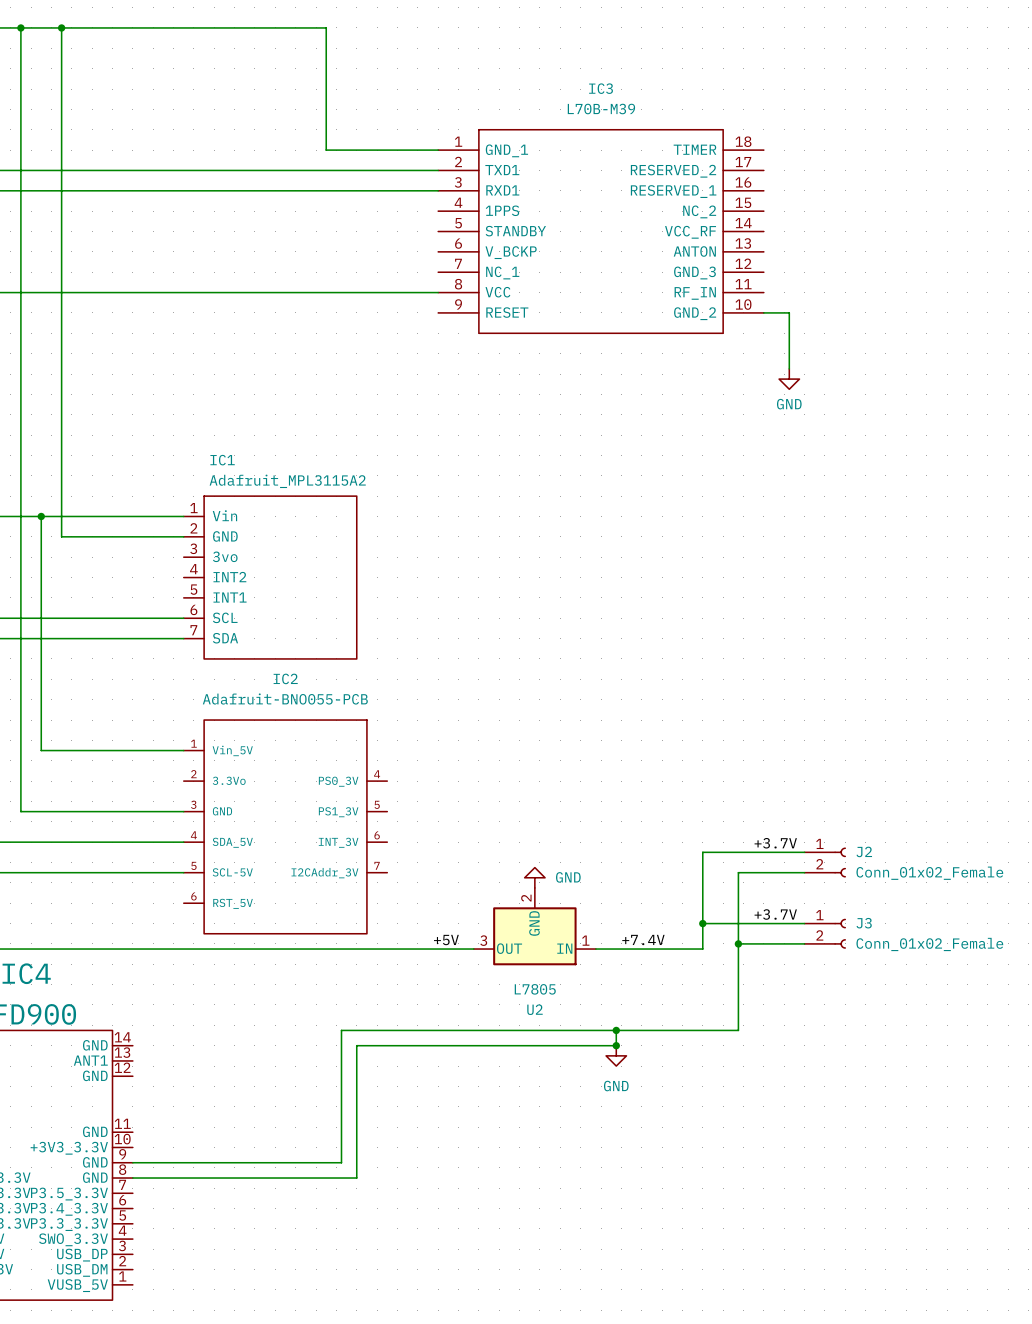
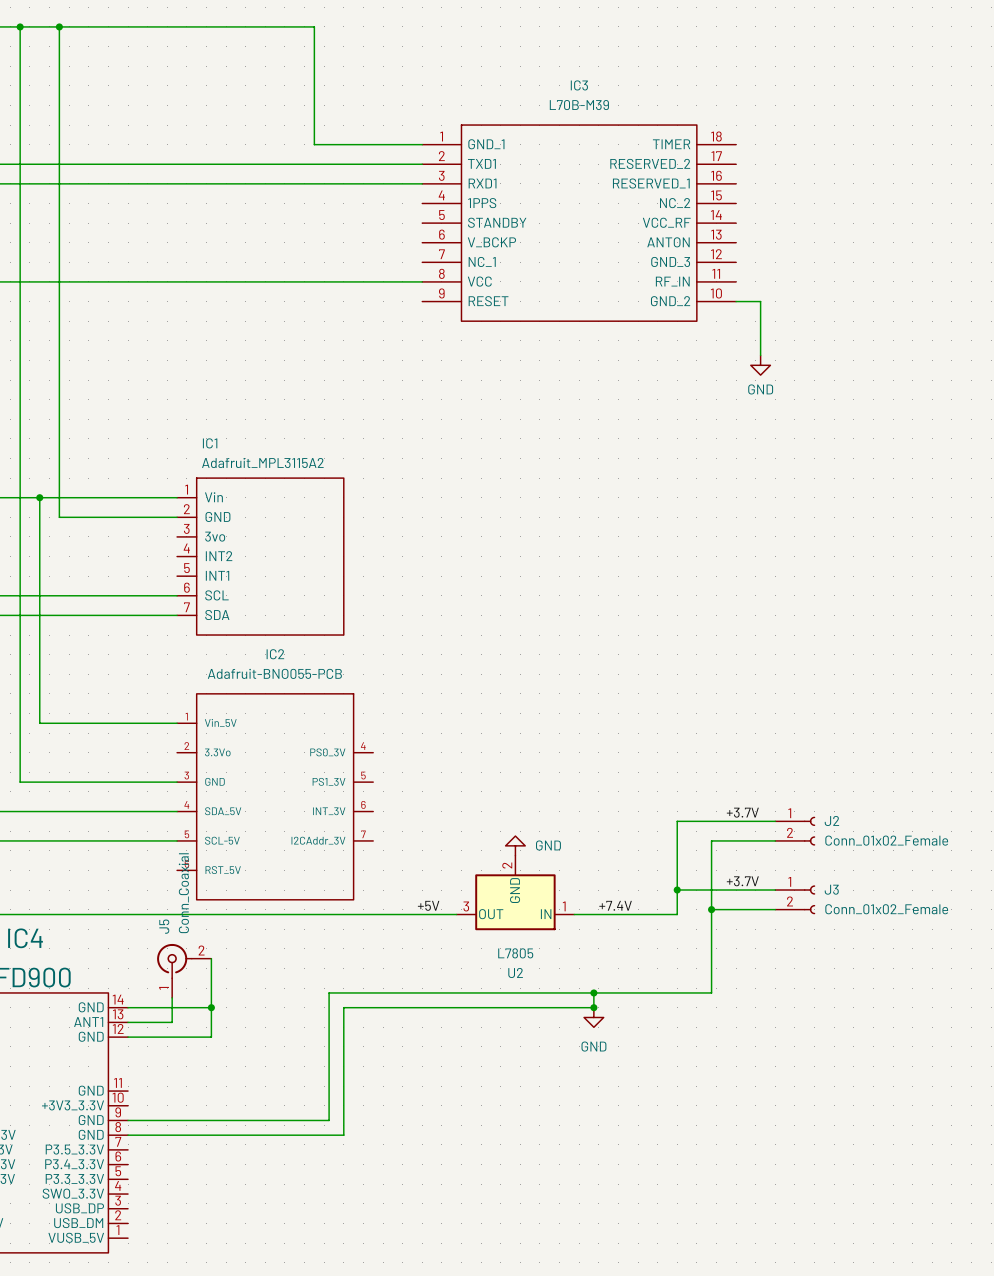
wire: none -> (211, 958) (211, 1037) (128, 1037)
J5: none -> Conn_Coaxial (184, 970)
wire: none -> (172, 997) (172, 1022) (128, 1022)
wire: none -> (128, 1007) (211, 1007)
junction: none -> (211, 1007)

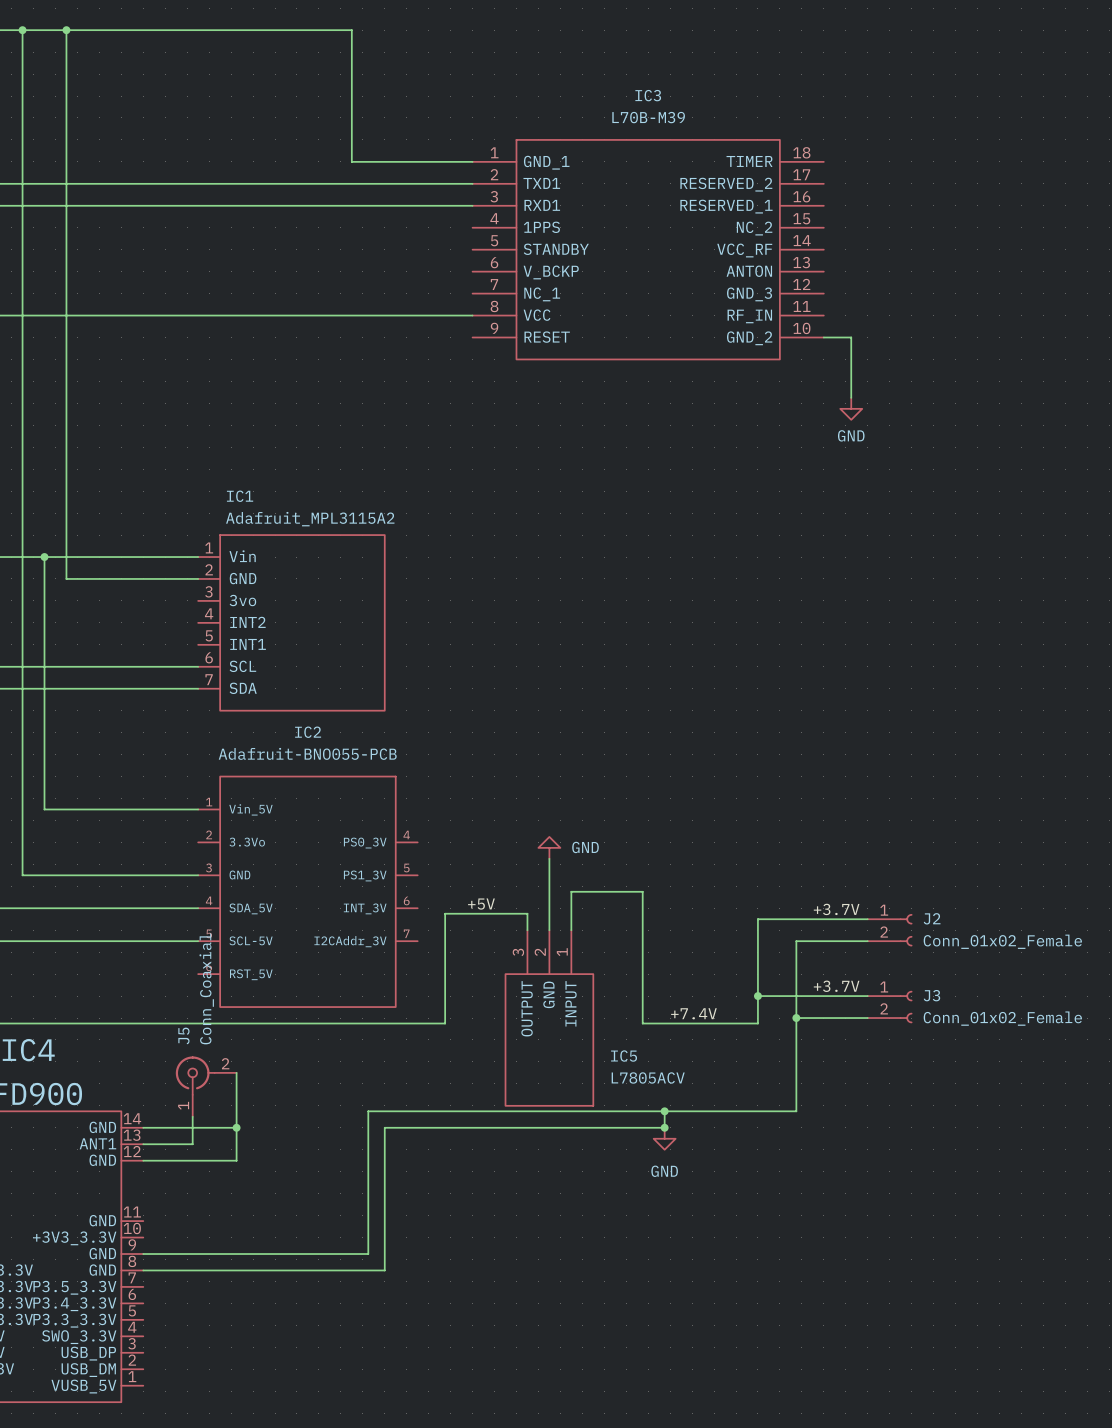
wire: none -> (549, 858) (549, 930)
wire: none -> (571, 930) (571, 891) (642, 891) (642, 1023)
power symbol position: GND (515, 845) -> GND (549, 847)
U2: L7805 (515, 892) -> none
label position: +5V (428, 905) -> +5V (481, 904)
IC5: none -> L7805ACV (549, 1018)
wire: (397, 914) (456, 914) -> (445, 1023) (445, 913) (527, 913) (527, 930)

